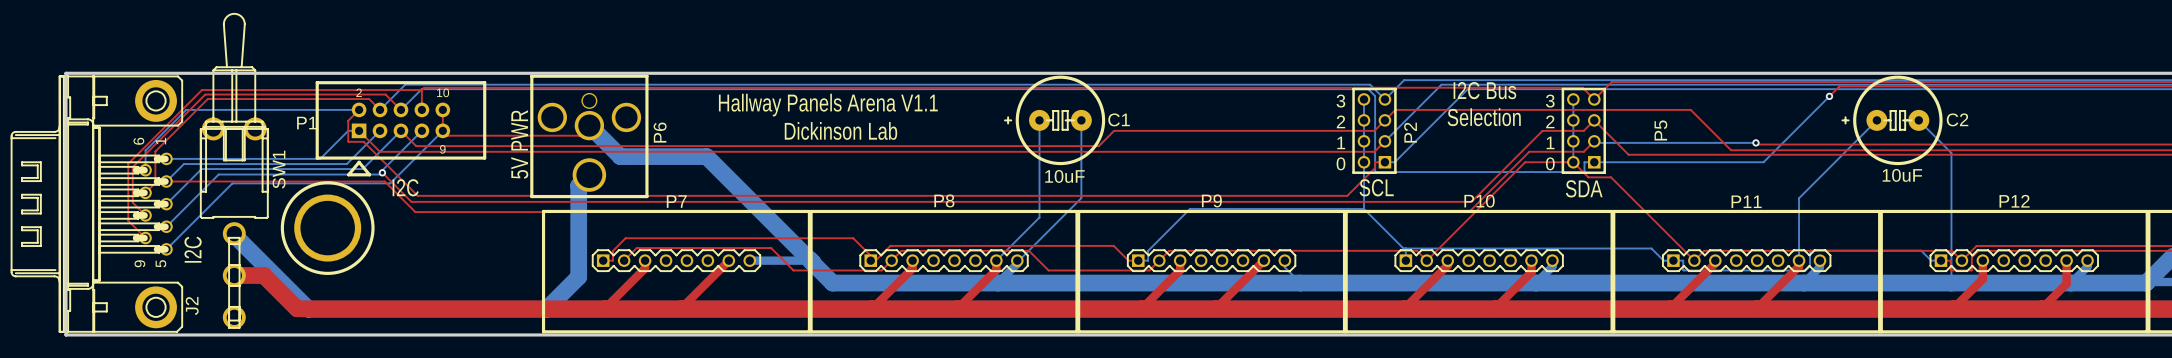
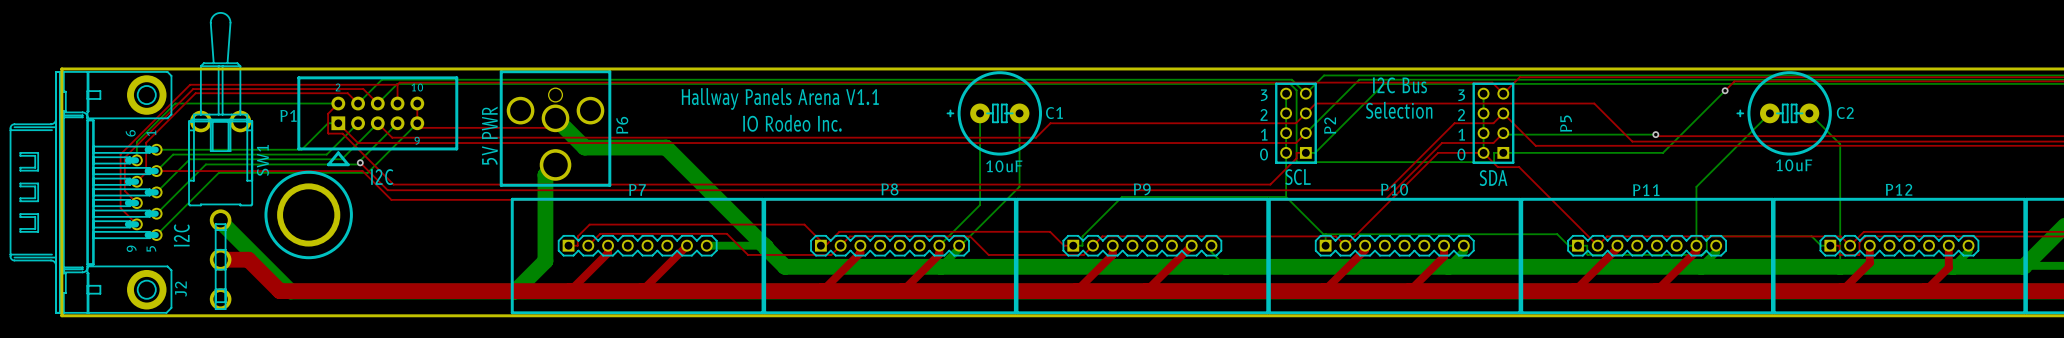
text: Dickinson Lab (840, 130) -> IO Rodeo Inc. (792, 123)

